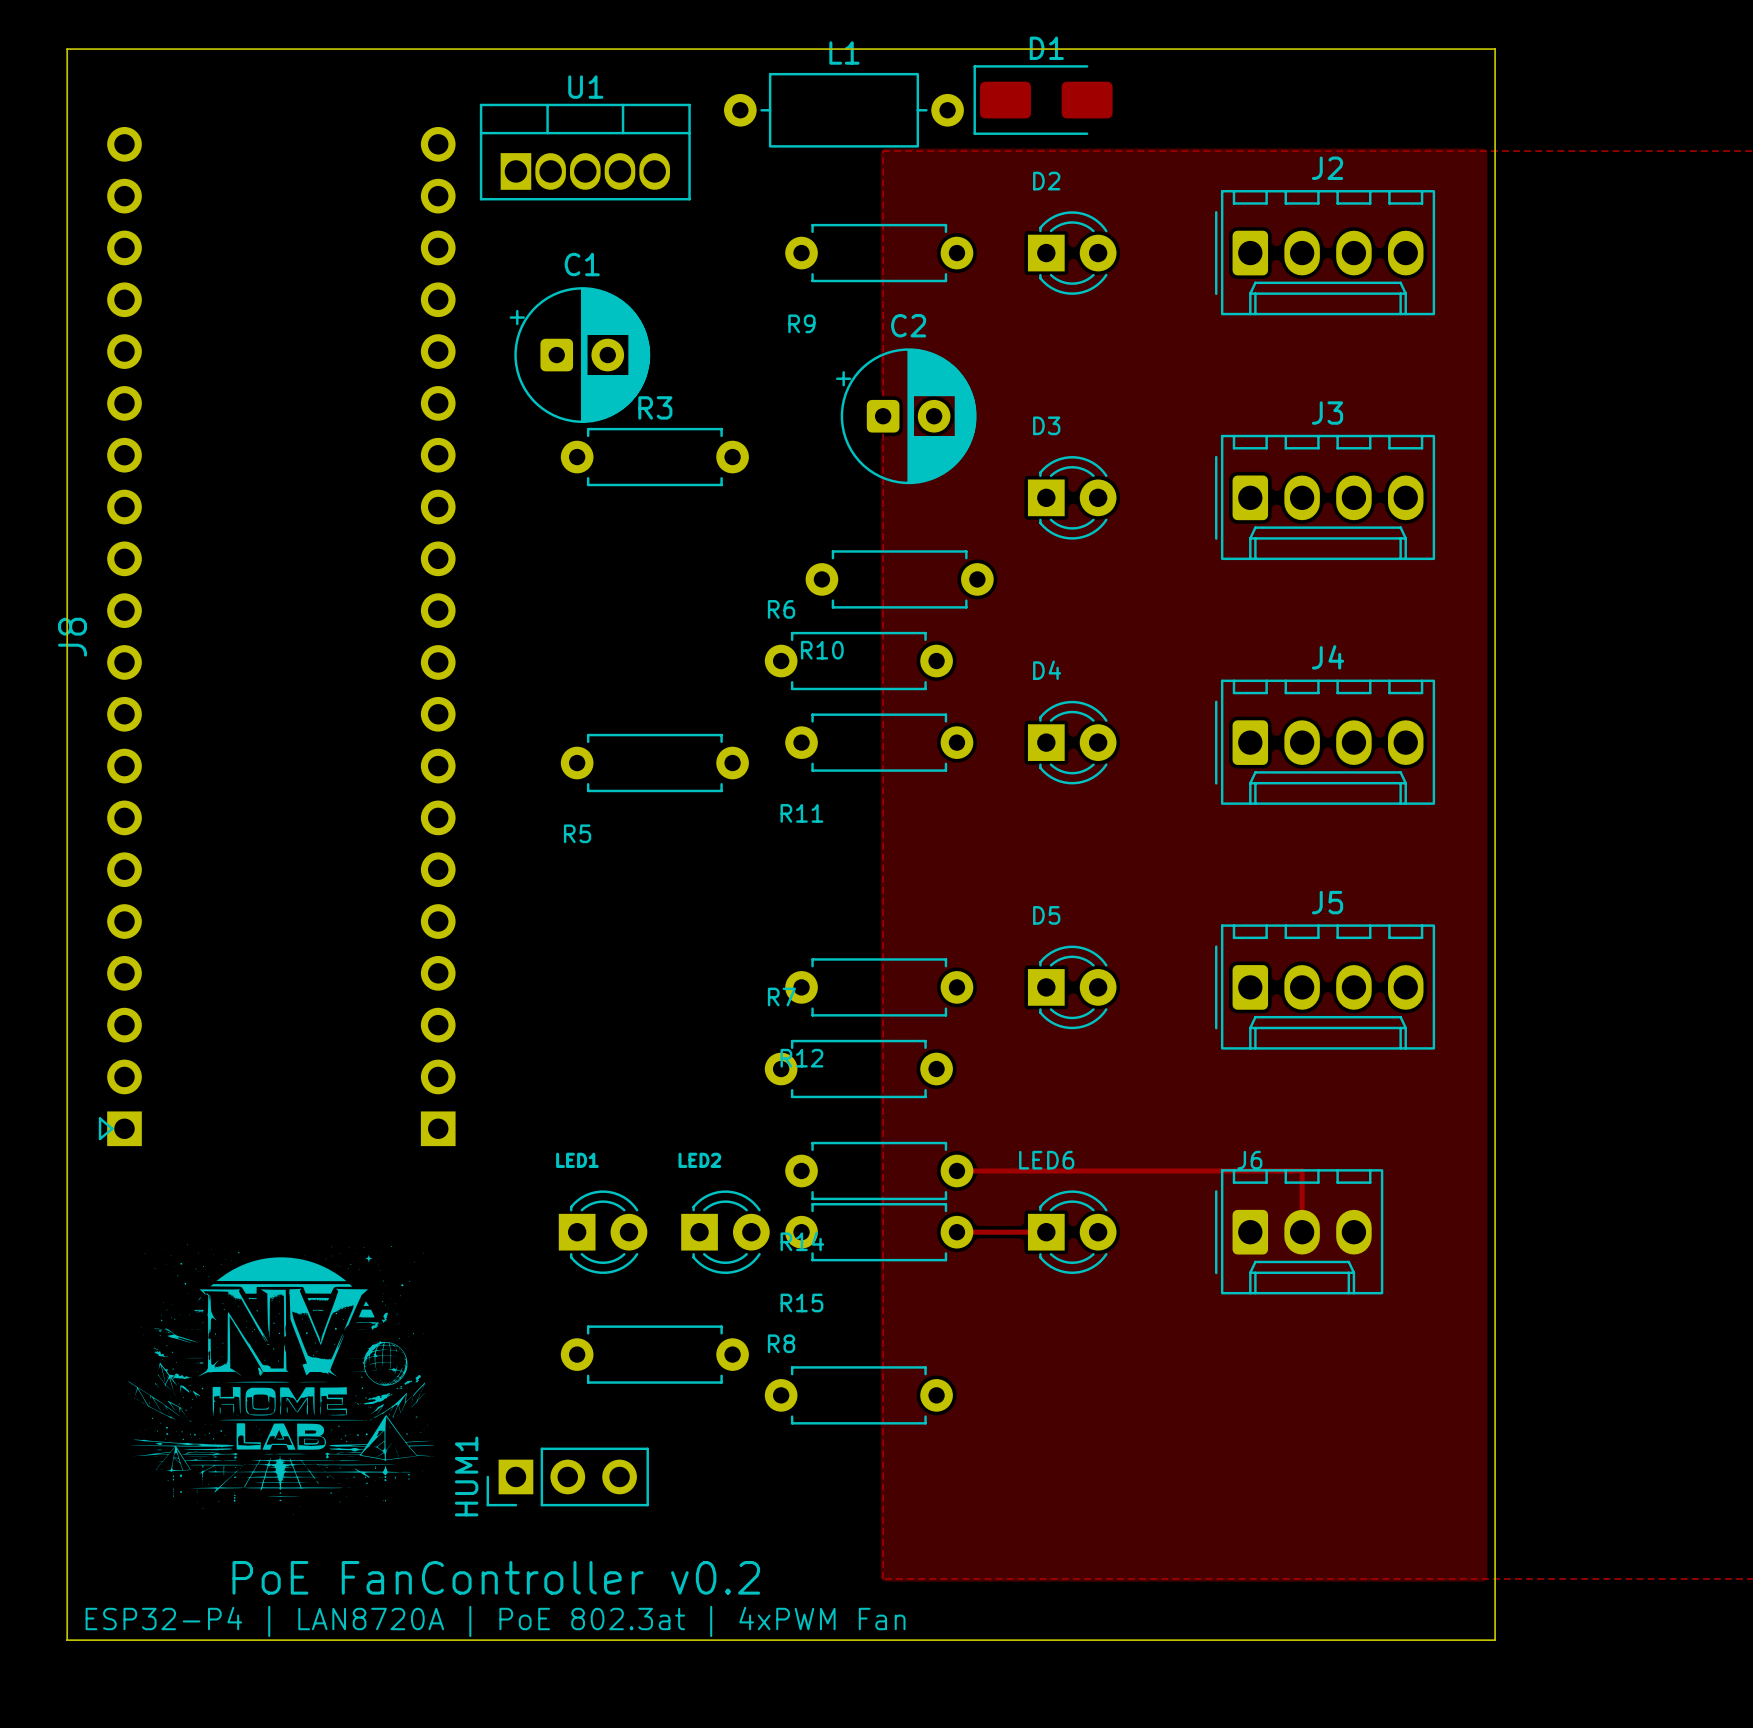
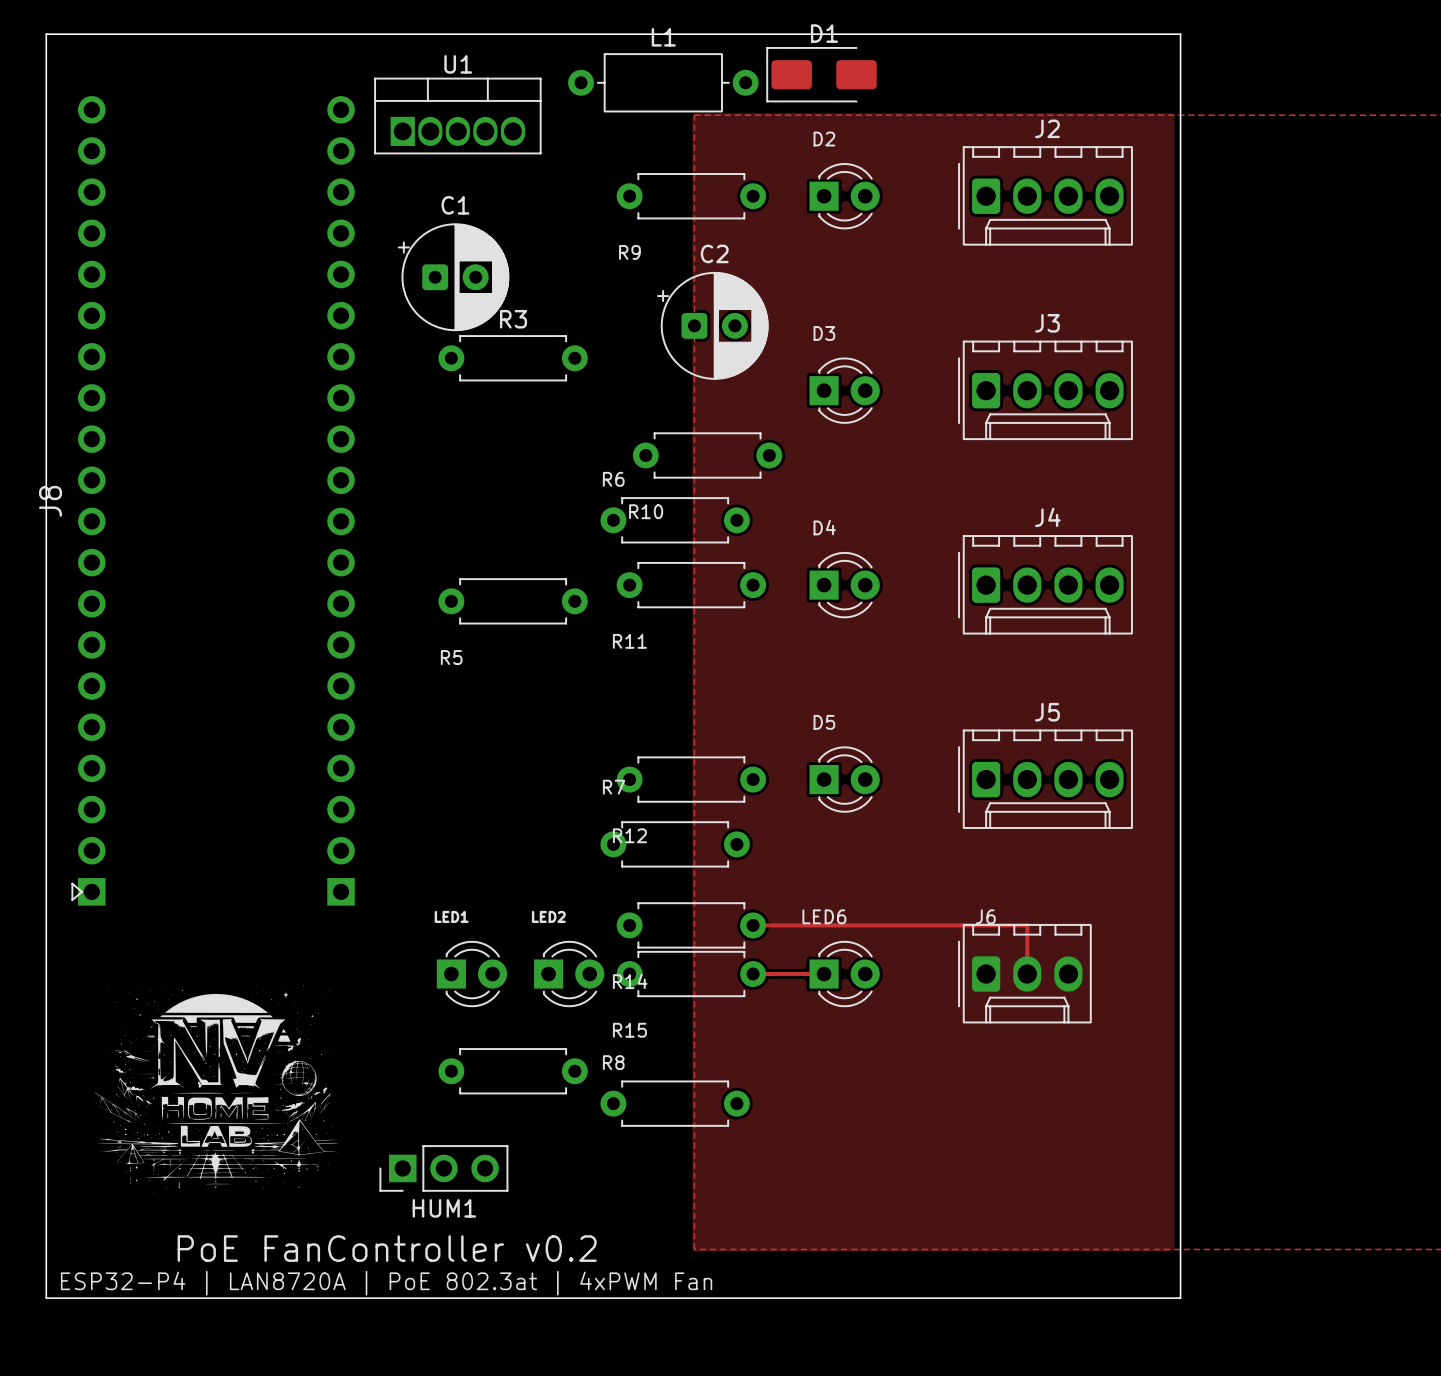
HUM1 name rotation: 0° (466, 1476) -> 90° clockwise (444, 1208)
HUM1 name position: HUM1 (466, 1476) -> HUM1 (444, 1208)

